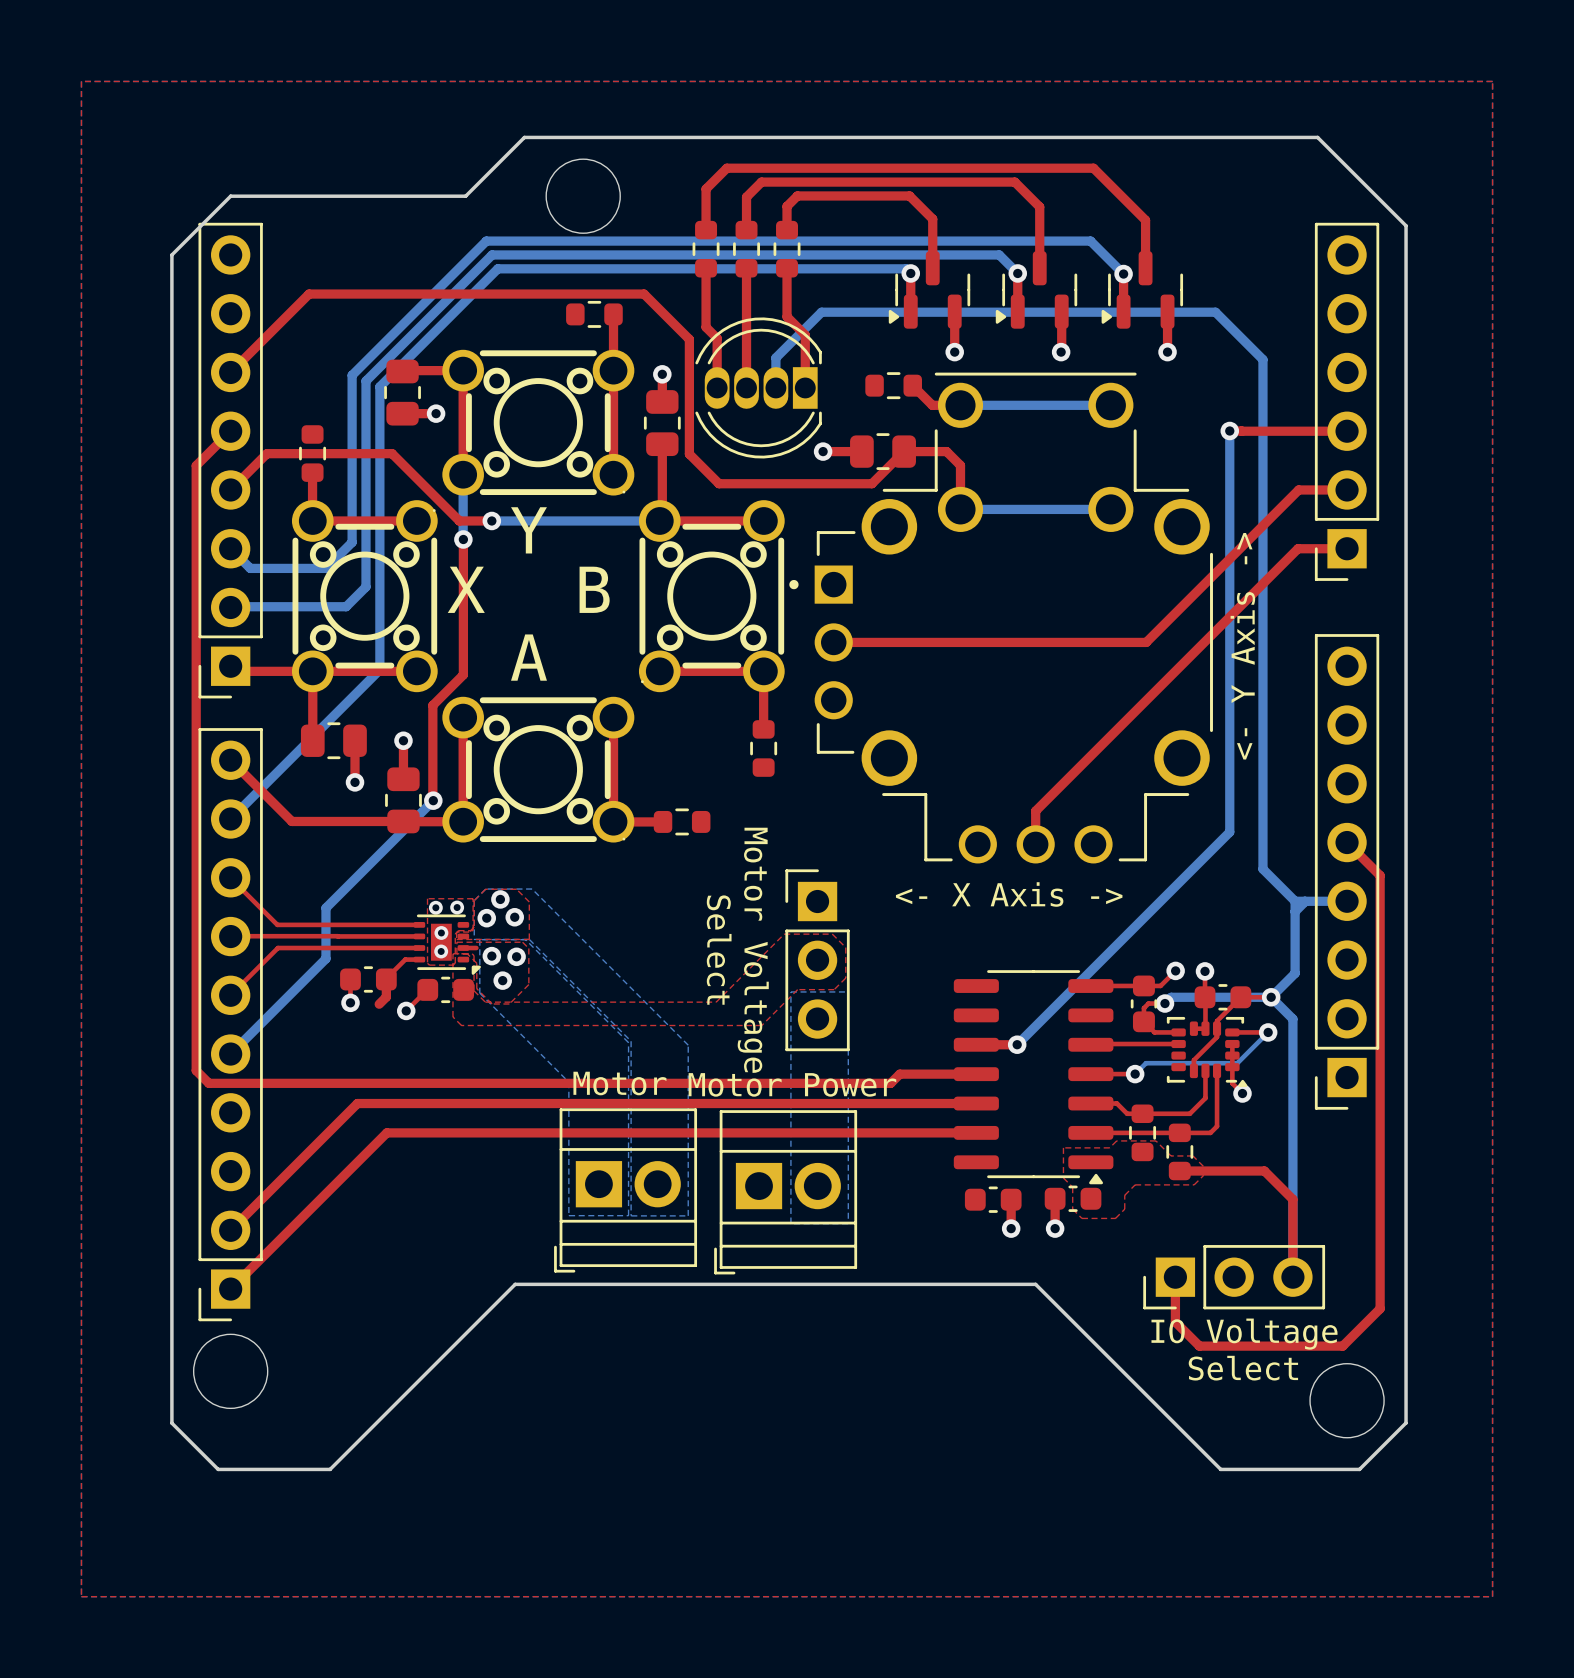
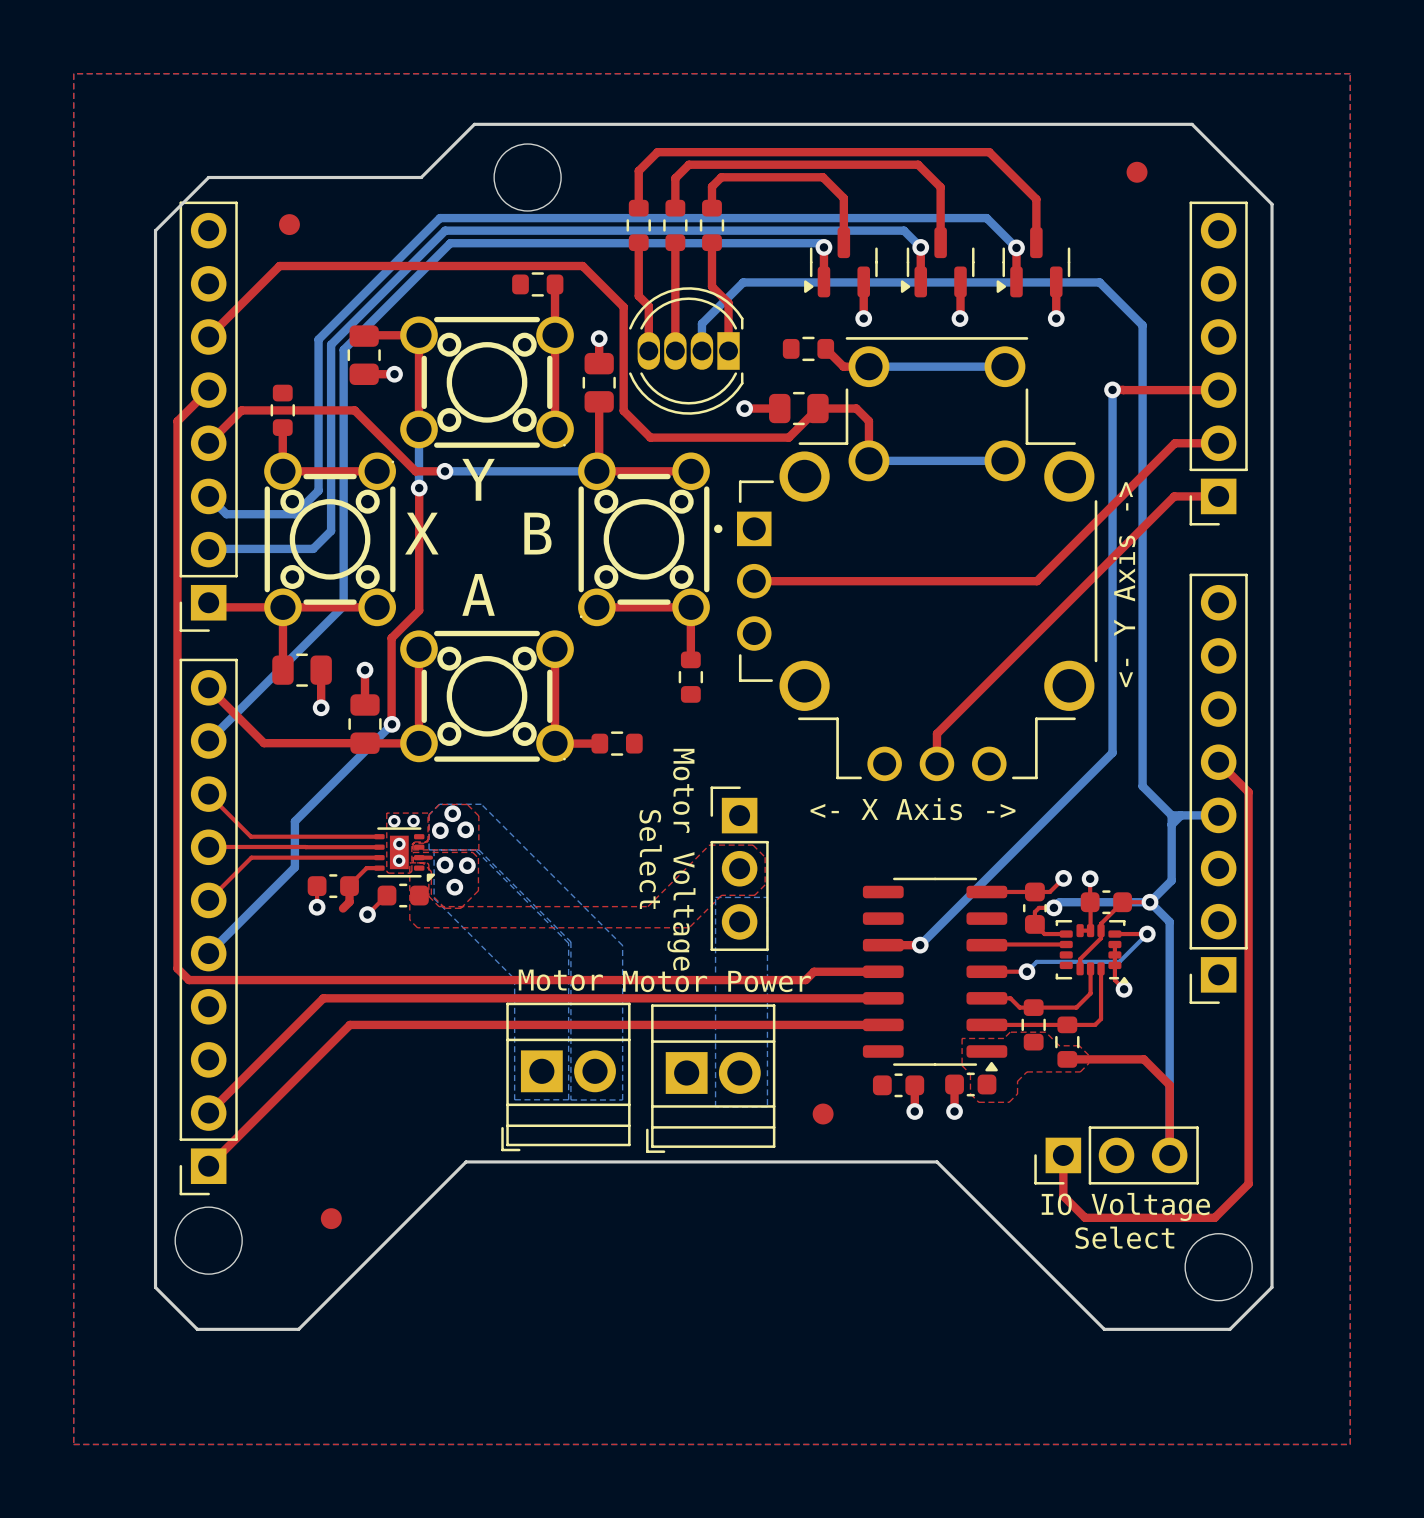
part: none -> (1137, 172)
part: none -> (289, 224)
part: none -> (823, 1114)
part: none -> (331, 1218)

